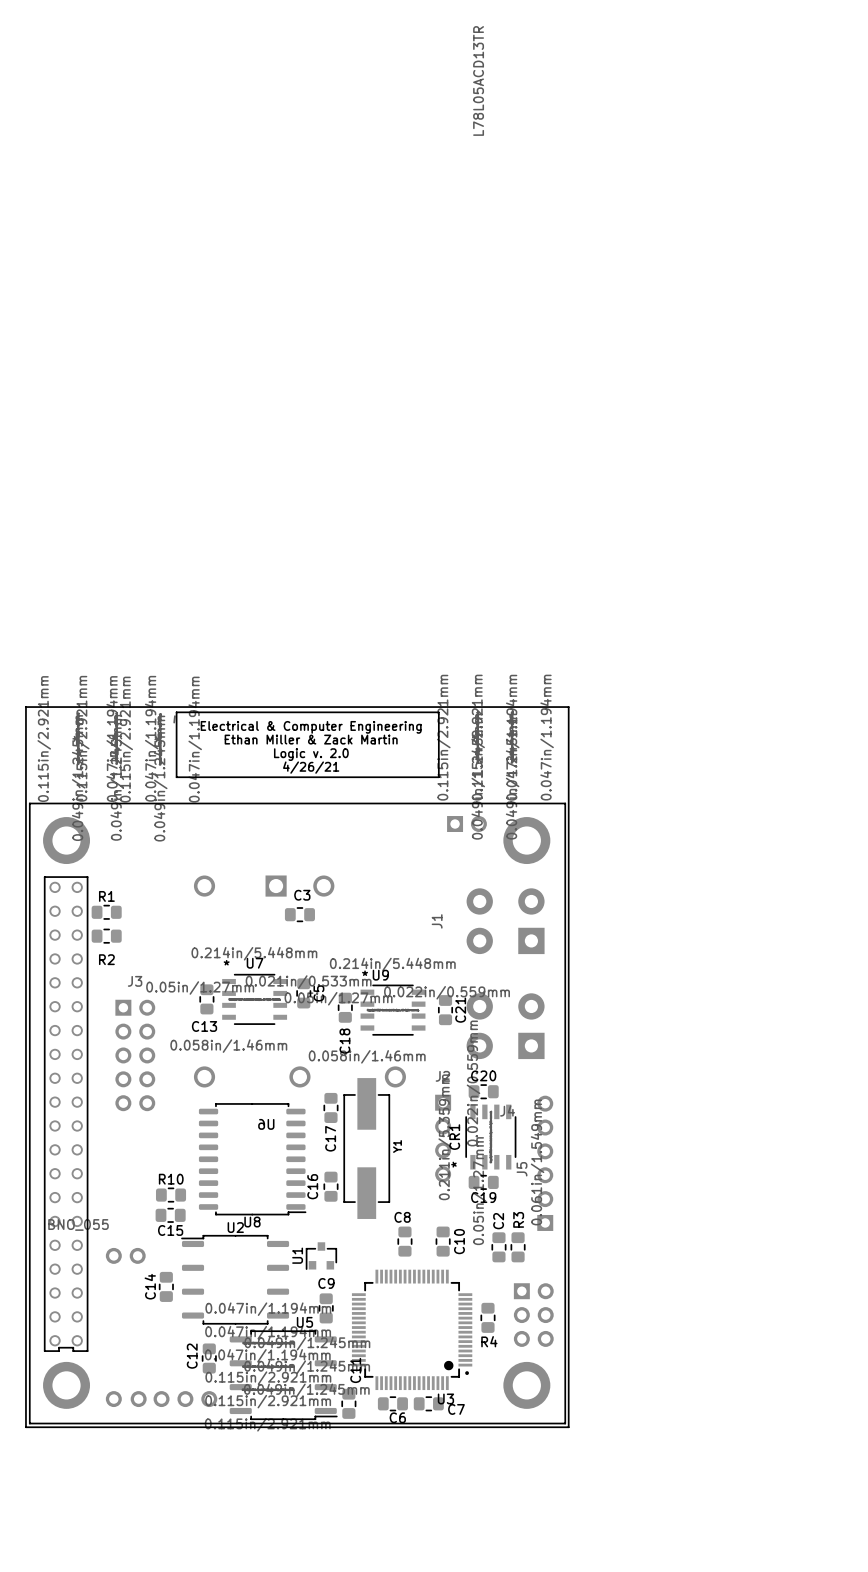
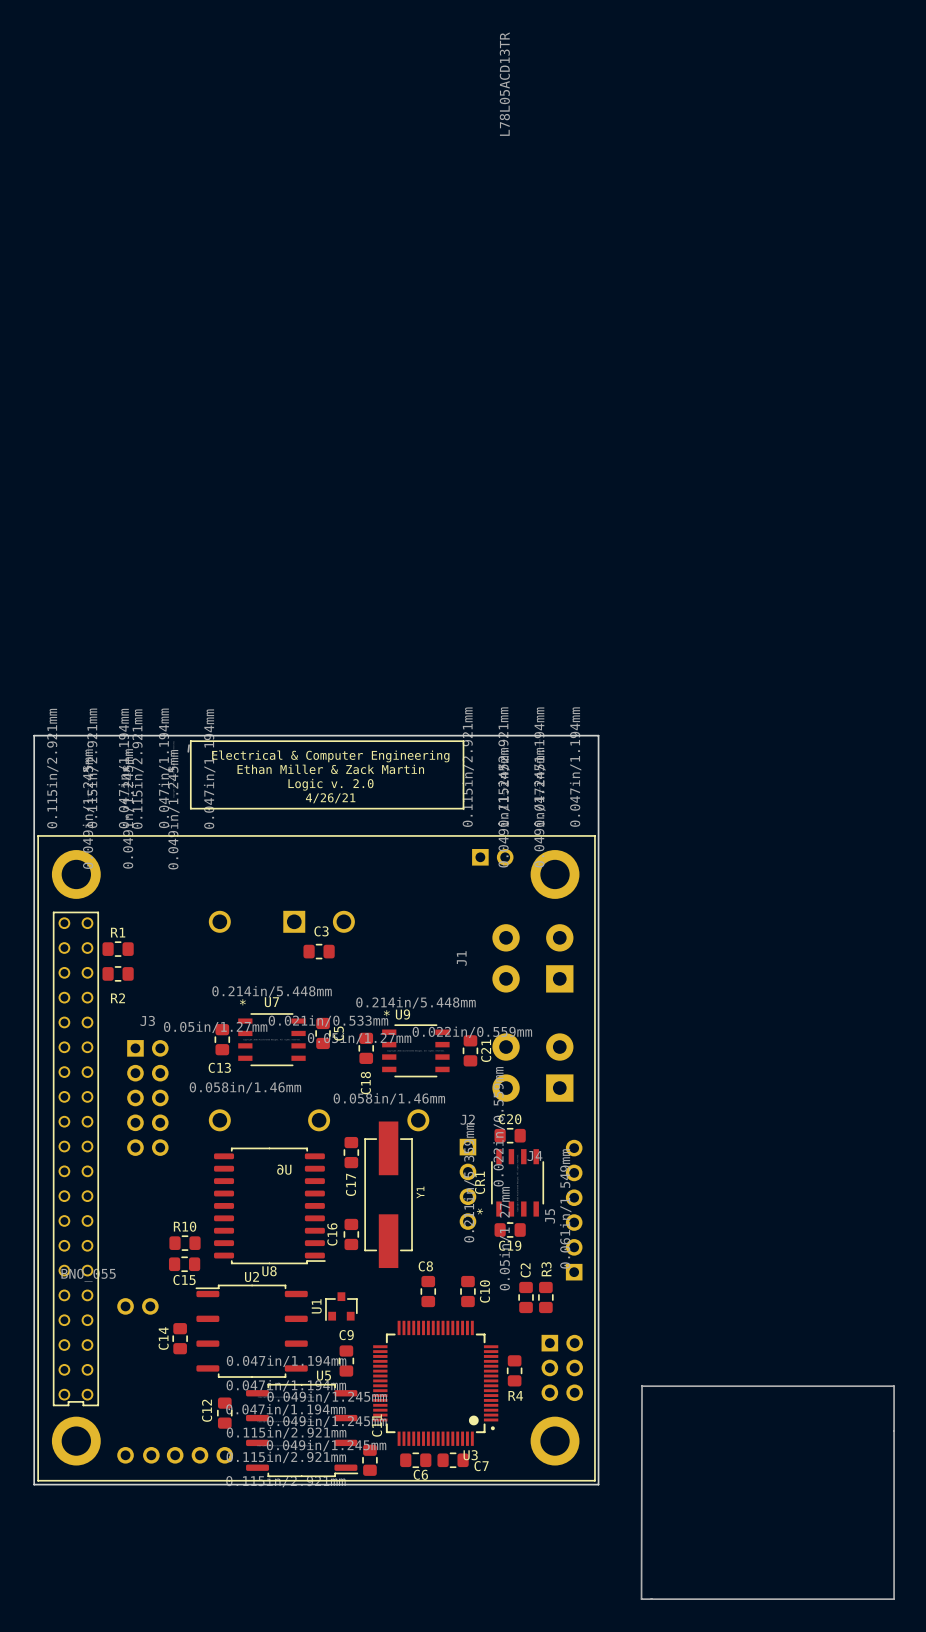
line: none -> (642, 1385) (641, 1599) (894, 1599) (894, 1386) (642, 1386)

